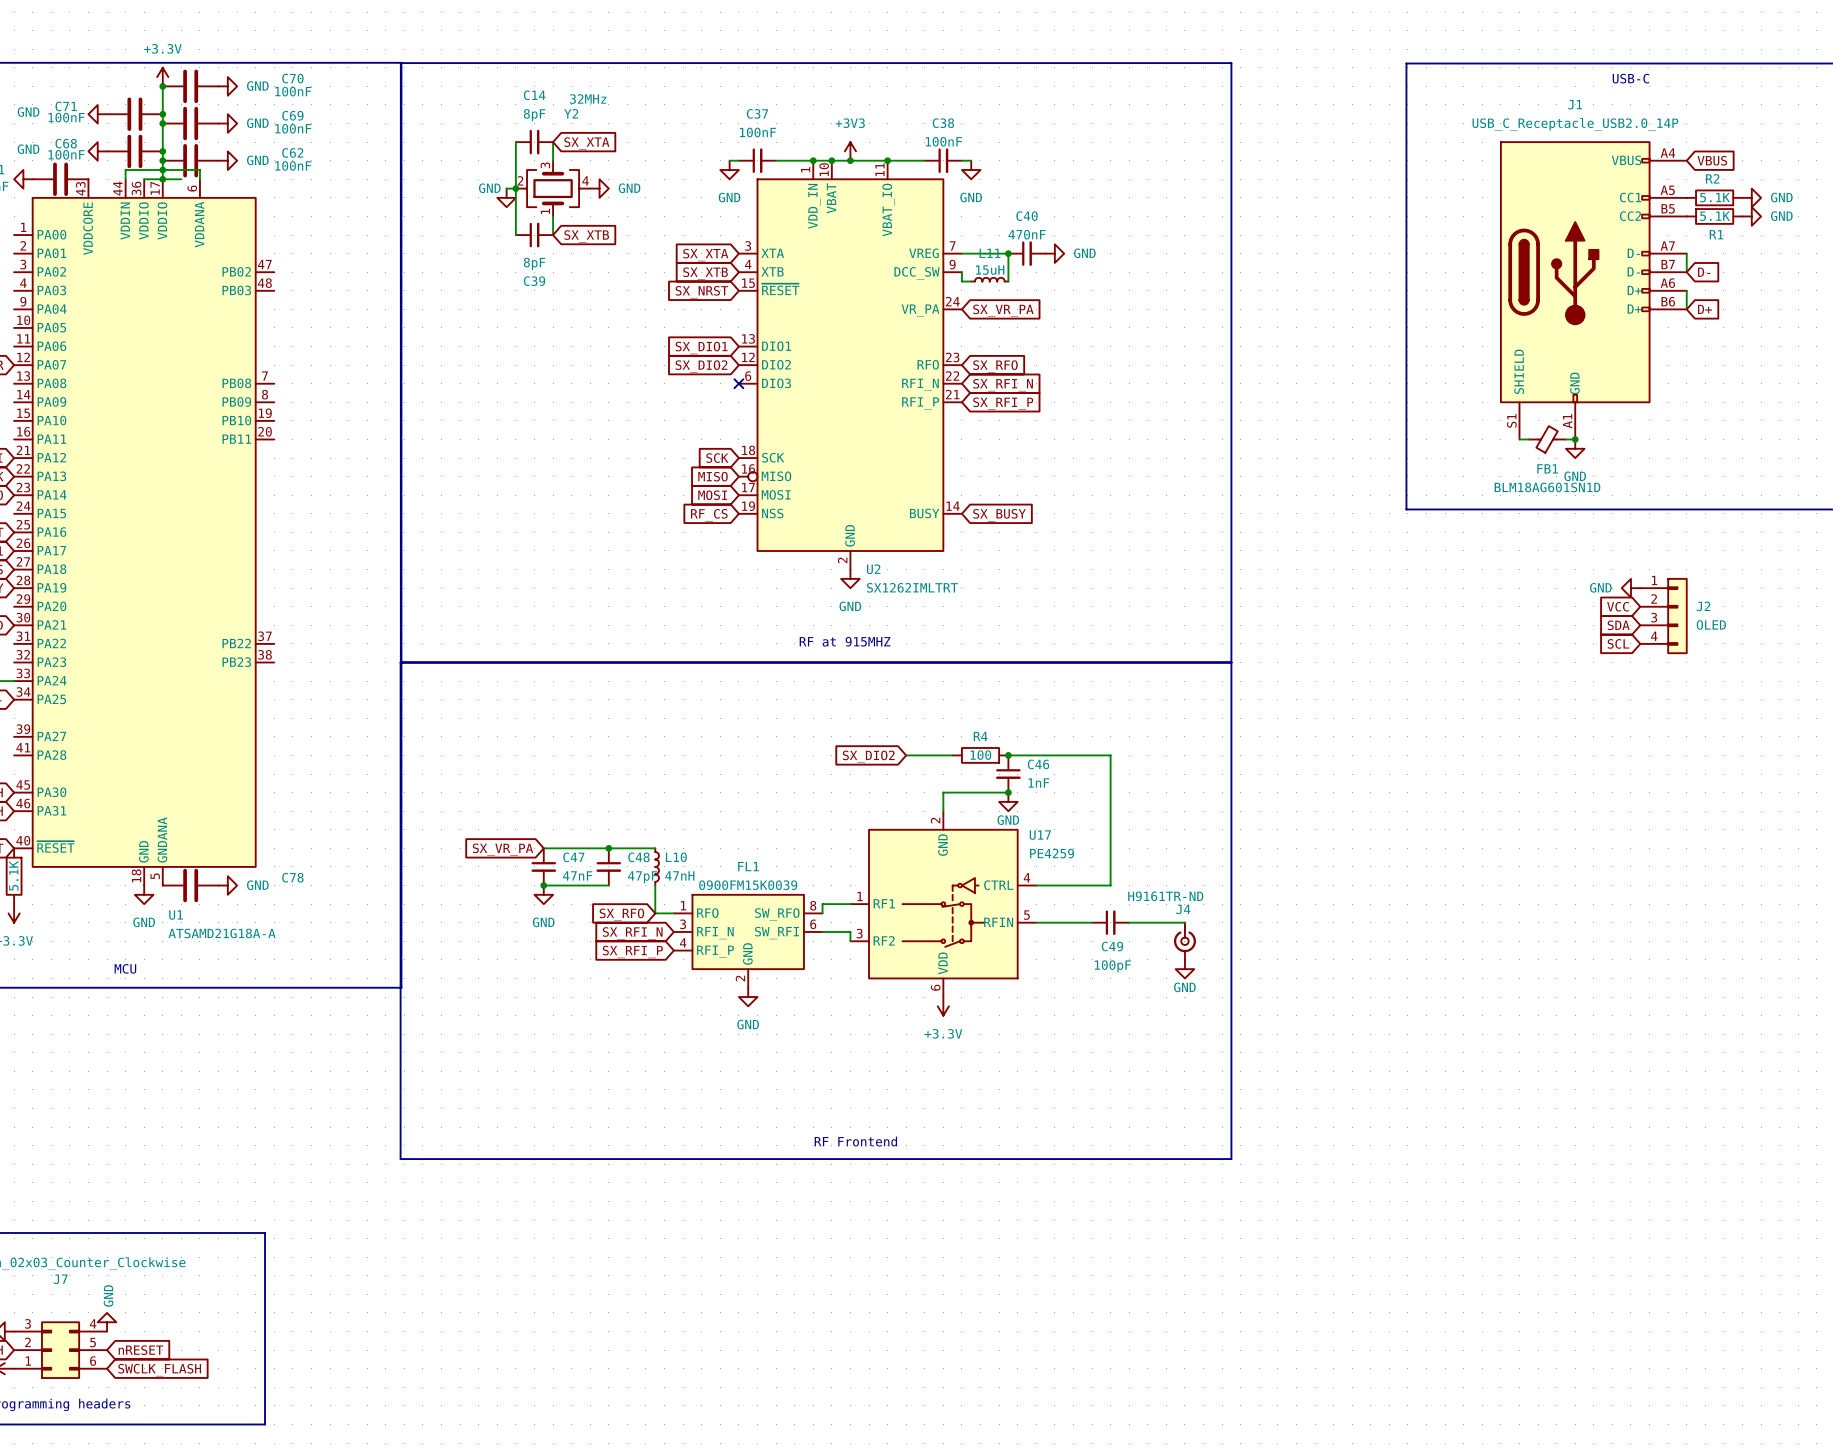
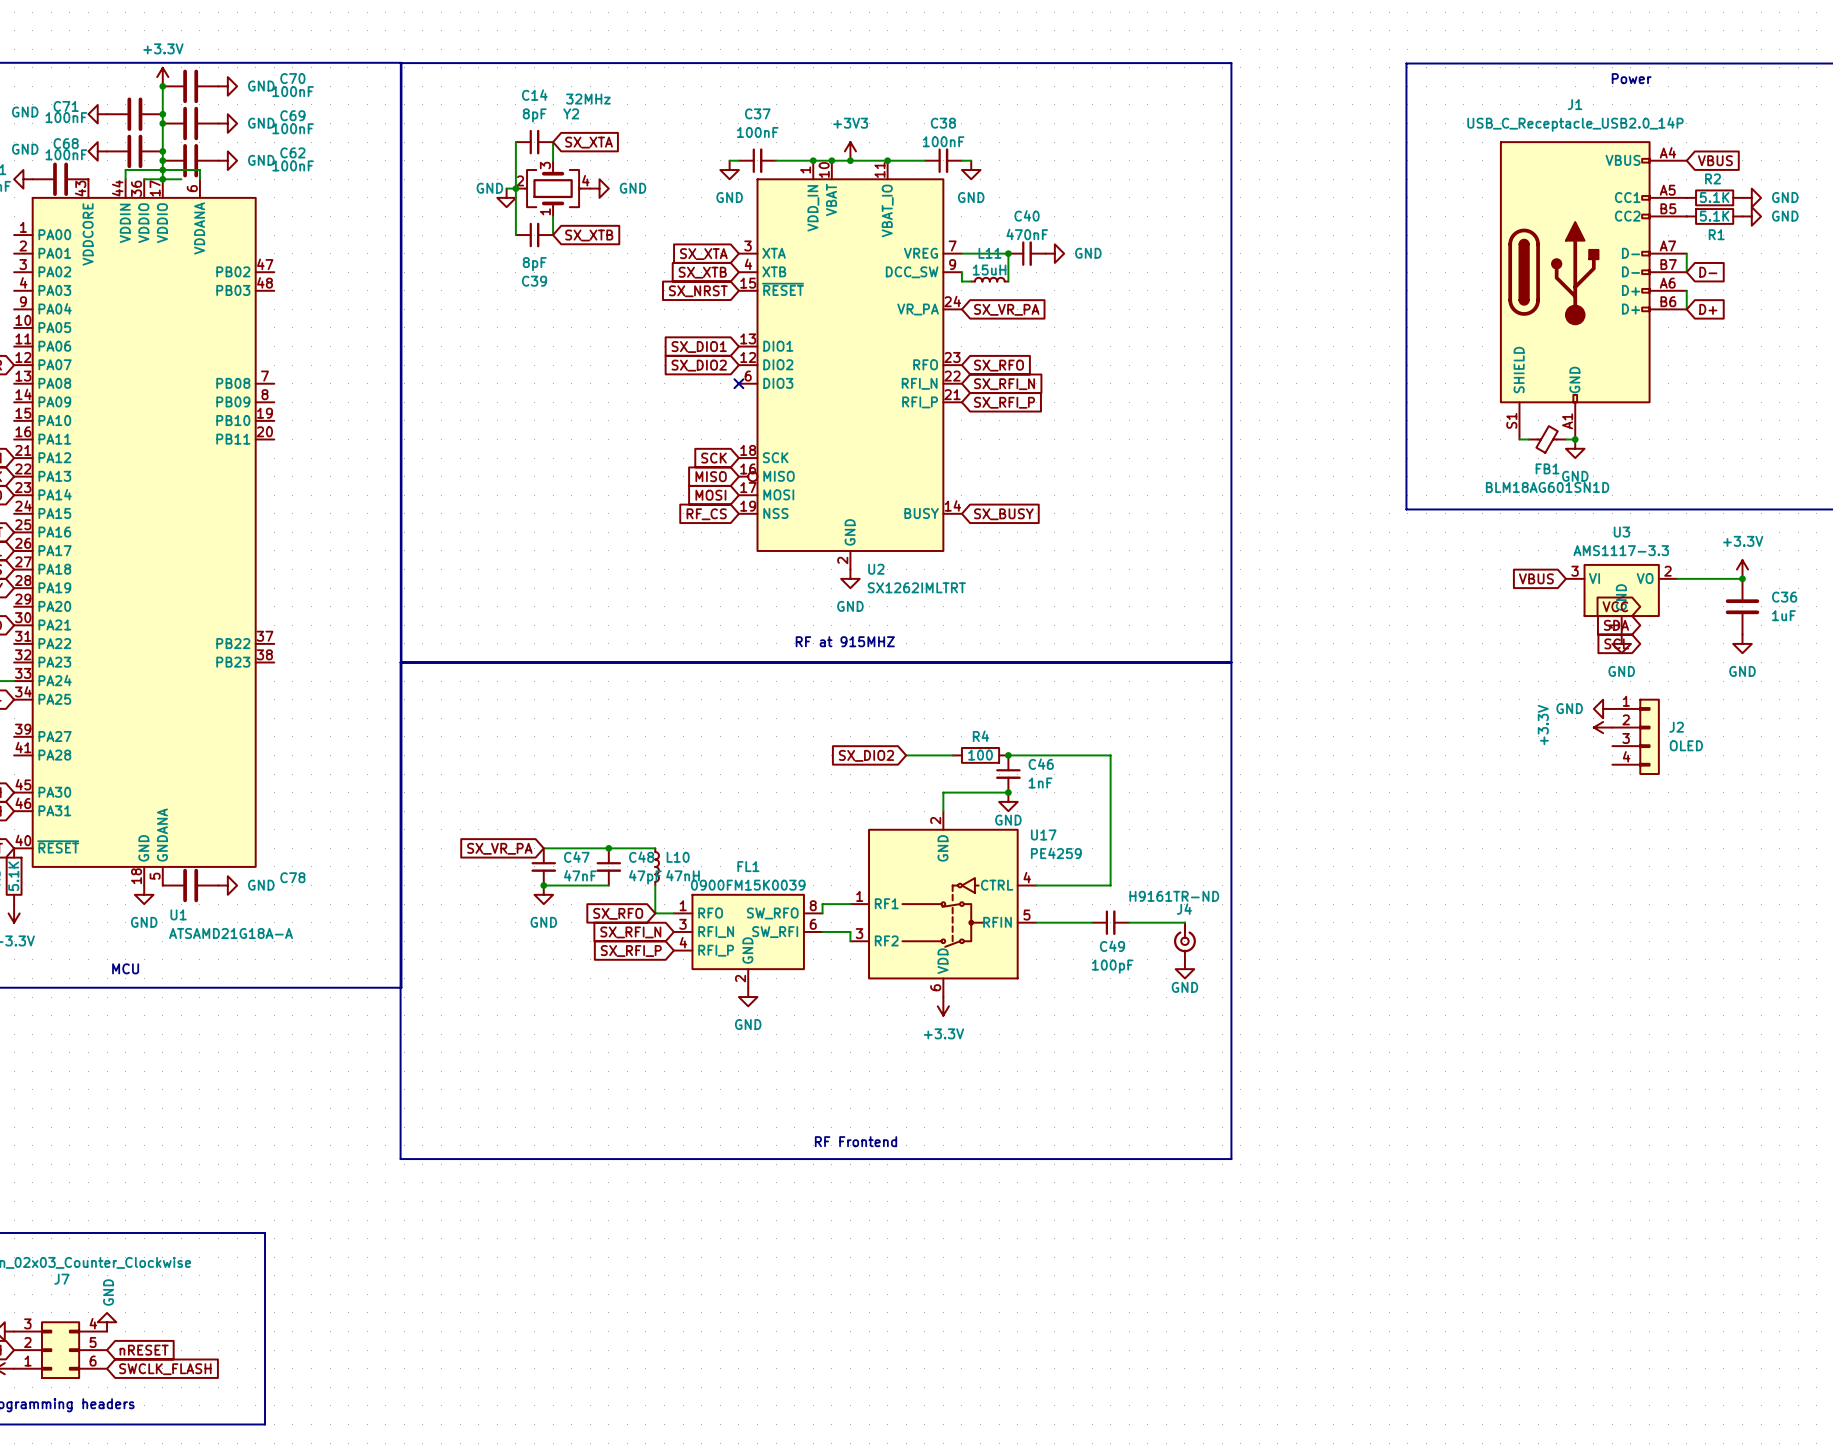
text: USB-C (1630, 78) -> Power (1631, 78)
power symbol: none -> +3.3V (1742, 569)
global label: none -> VBUS (1536, 578)
wire: none -> (1677, 578) (1742, 578)
junction: none -> (1742, 578)
power symbol rotation: 0° (1630, 588) -> 90° counterclockwise (1621, 643)
power symbol position: GND (1630, 588) -> GND (1621, 643)
U3: none -> AMS1117-3.3 (1621, 599)
C36: none -> 1uF (1742, 606)
J2 position: (1663, 616) -> (1636, 736)
power symbol: none -> GND (1742, 643)
power symbol: none -> GND (1603, 708)
power symbol: none -> +3.3V (1603, 727)

